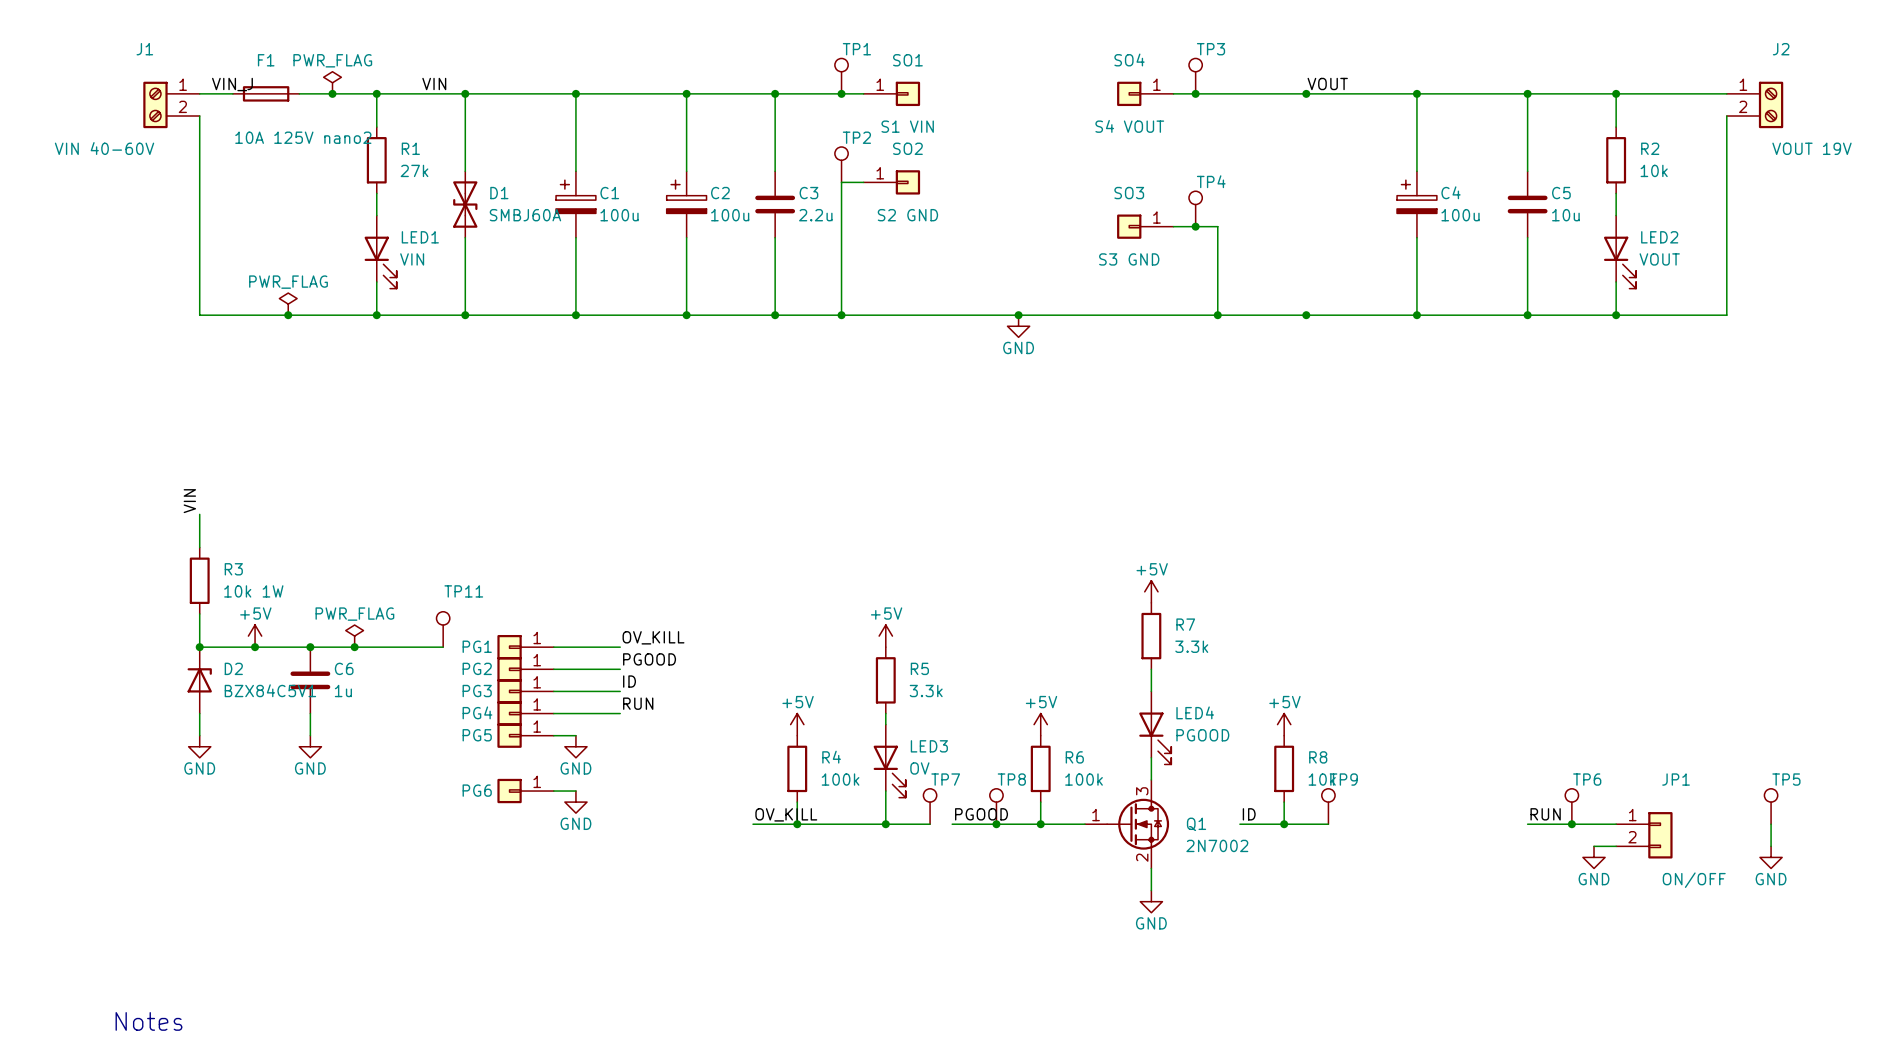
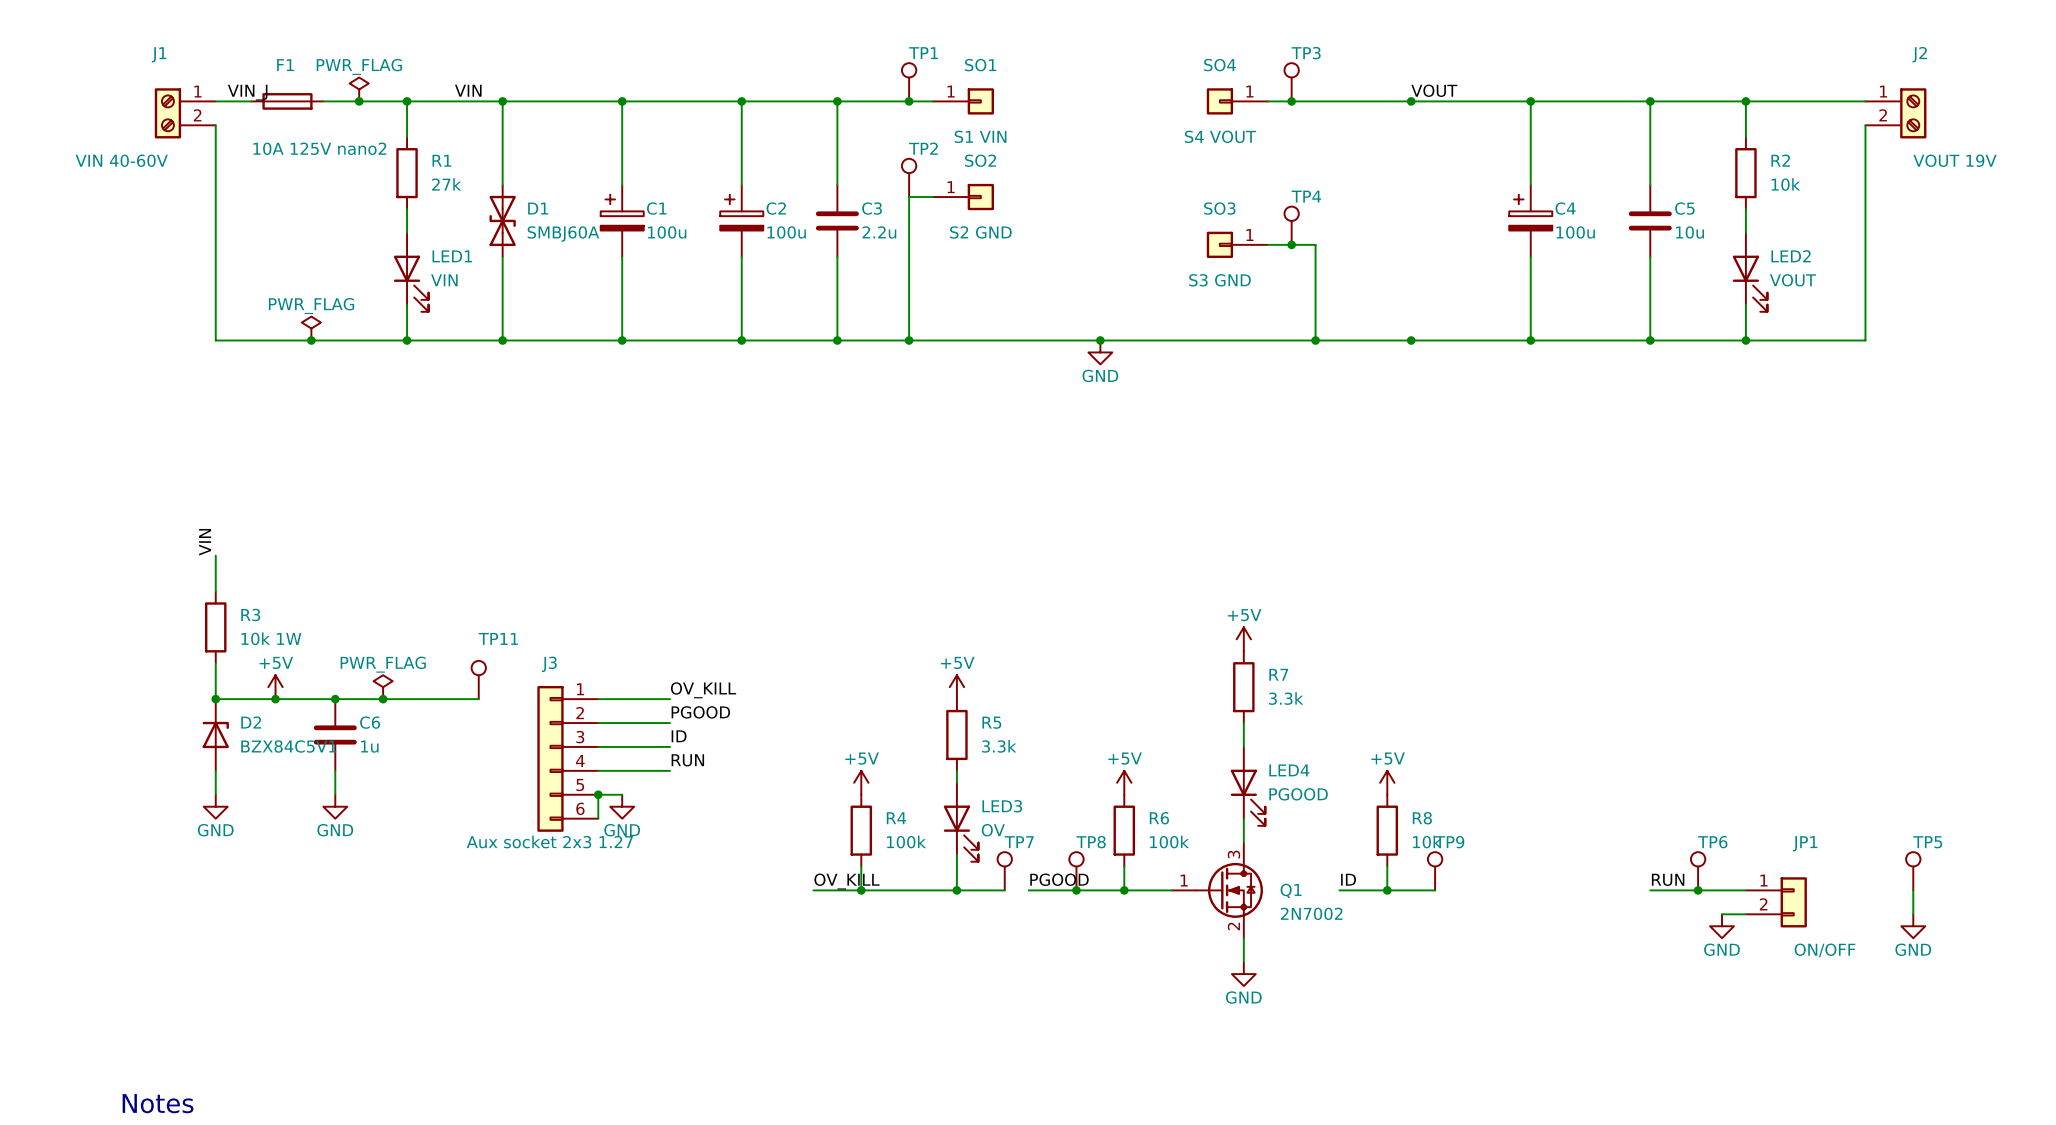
PG1: (525, 647) -> none
PG2: (525, 669) -> none
PG3: (525, 691) -> none
J3: none -> Aux socket 2x3 1.27 (567, 758)
PG4: (525, 713) -> none
PG5: (525, 735) -> none
wire: none -> (598, 794) (598, 818)
junction: none -> (598, 794)
PG6: (525, 791) -> none
wire: (553, 791) (575, 791) -> none
power symbol: GND (575, 802) -> none

